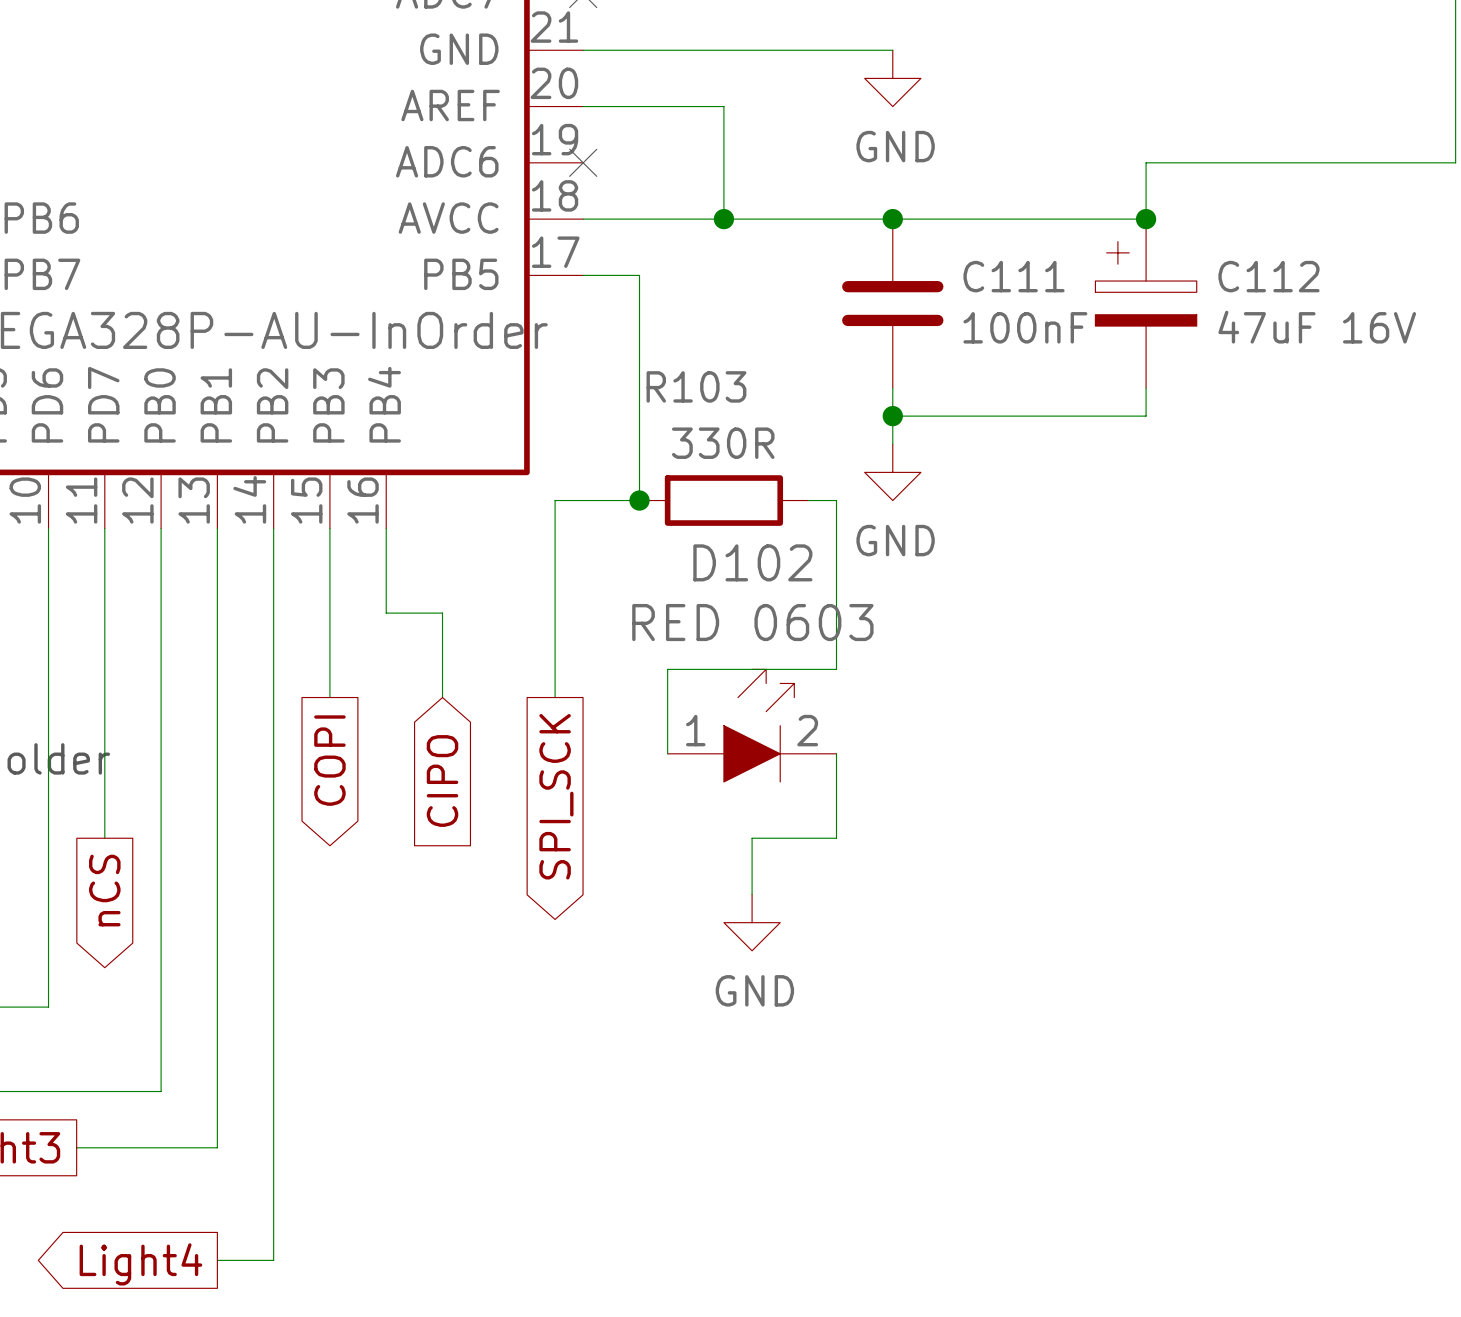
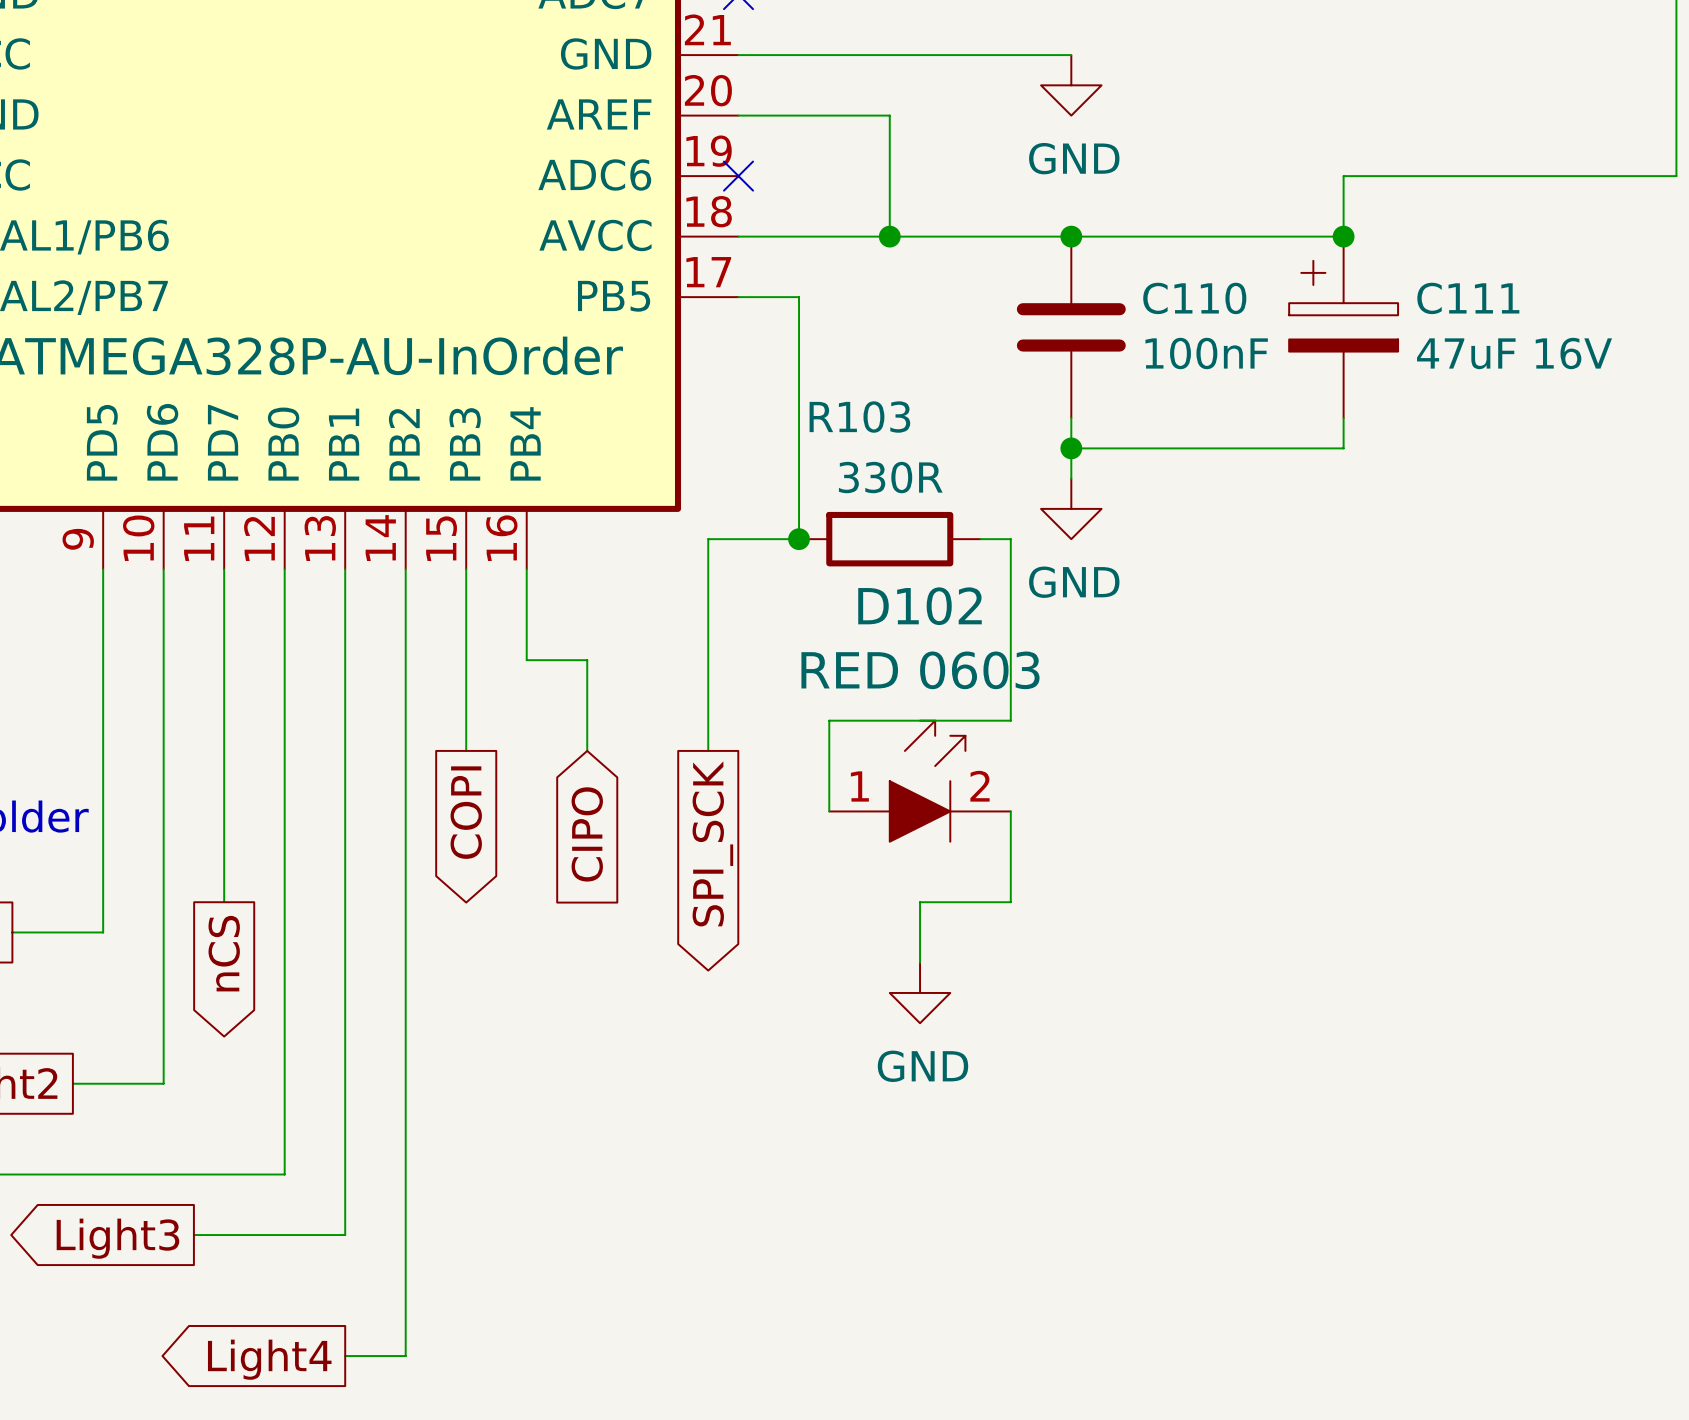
C111 name: C111 (1014, 276) -> C110 (1194, 298)
C112 name: C112 (1268, 276) -> C111 (1468, 298)

